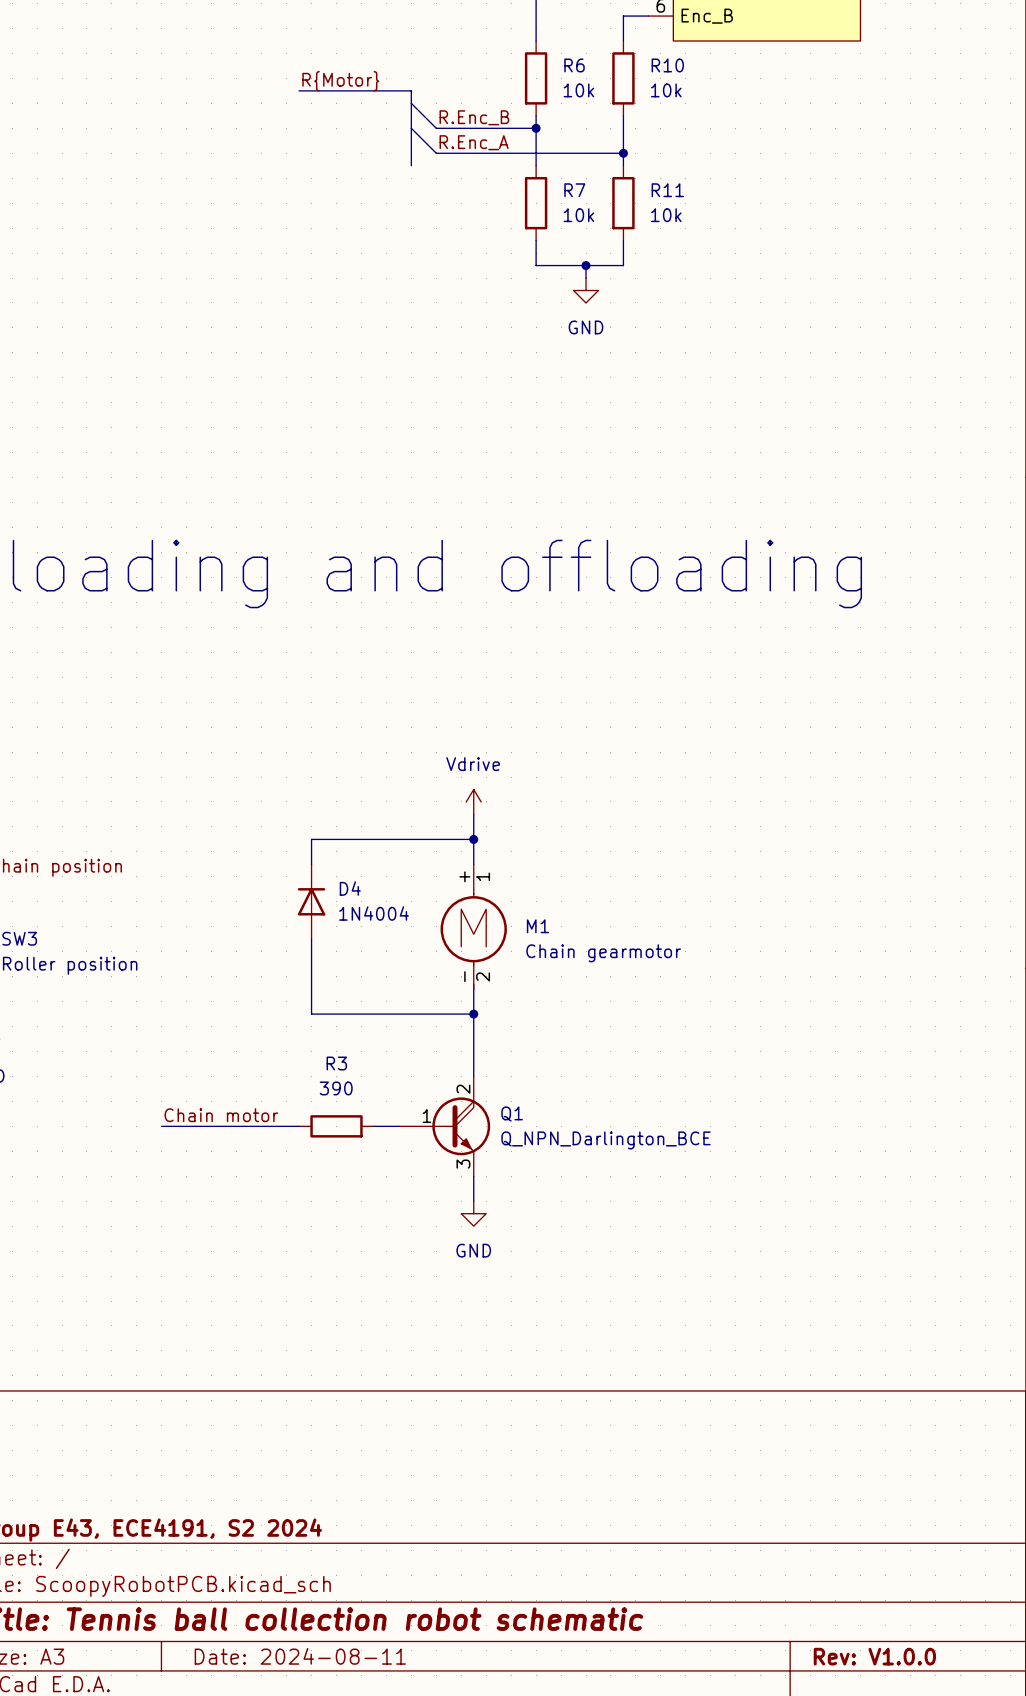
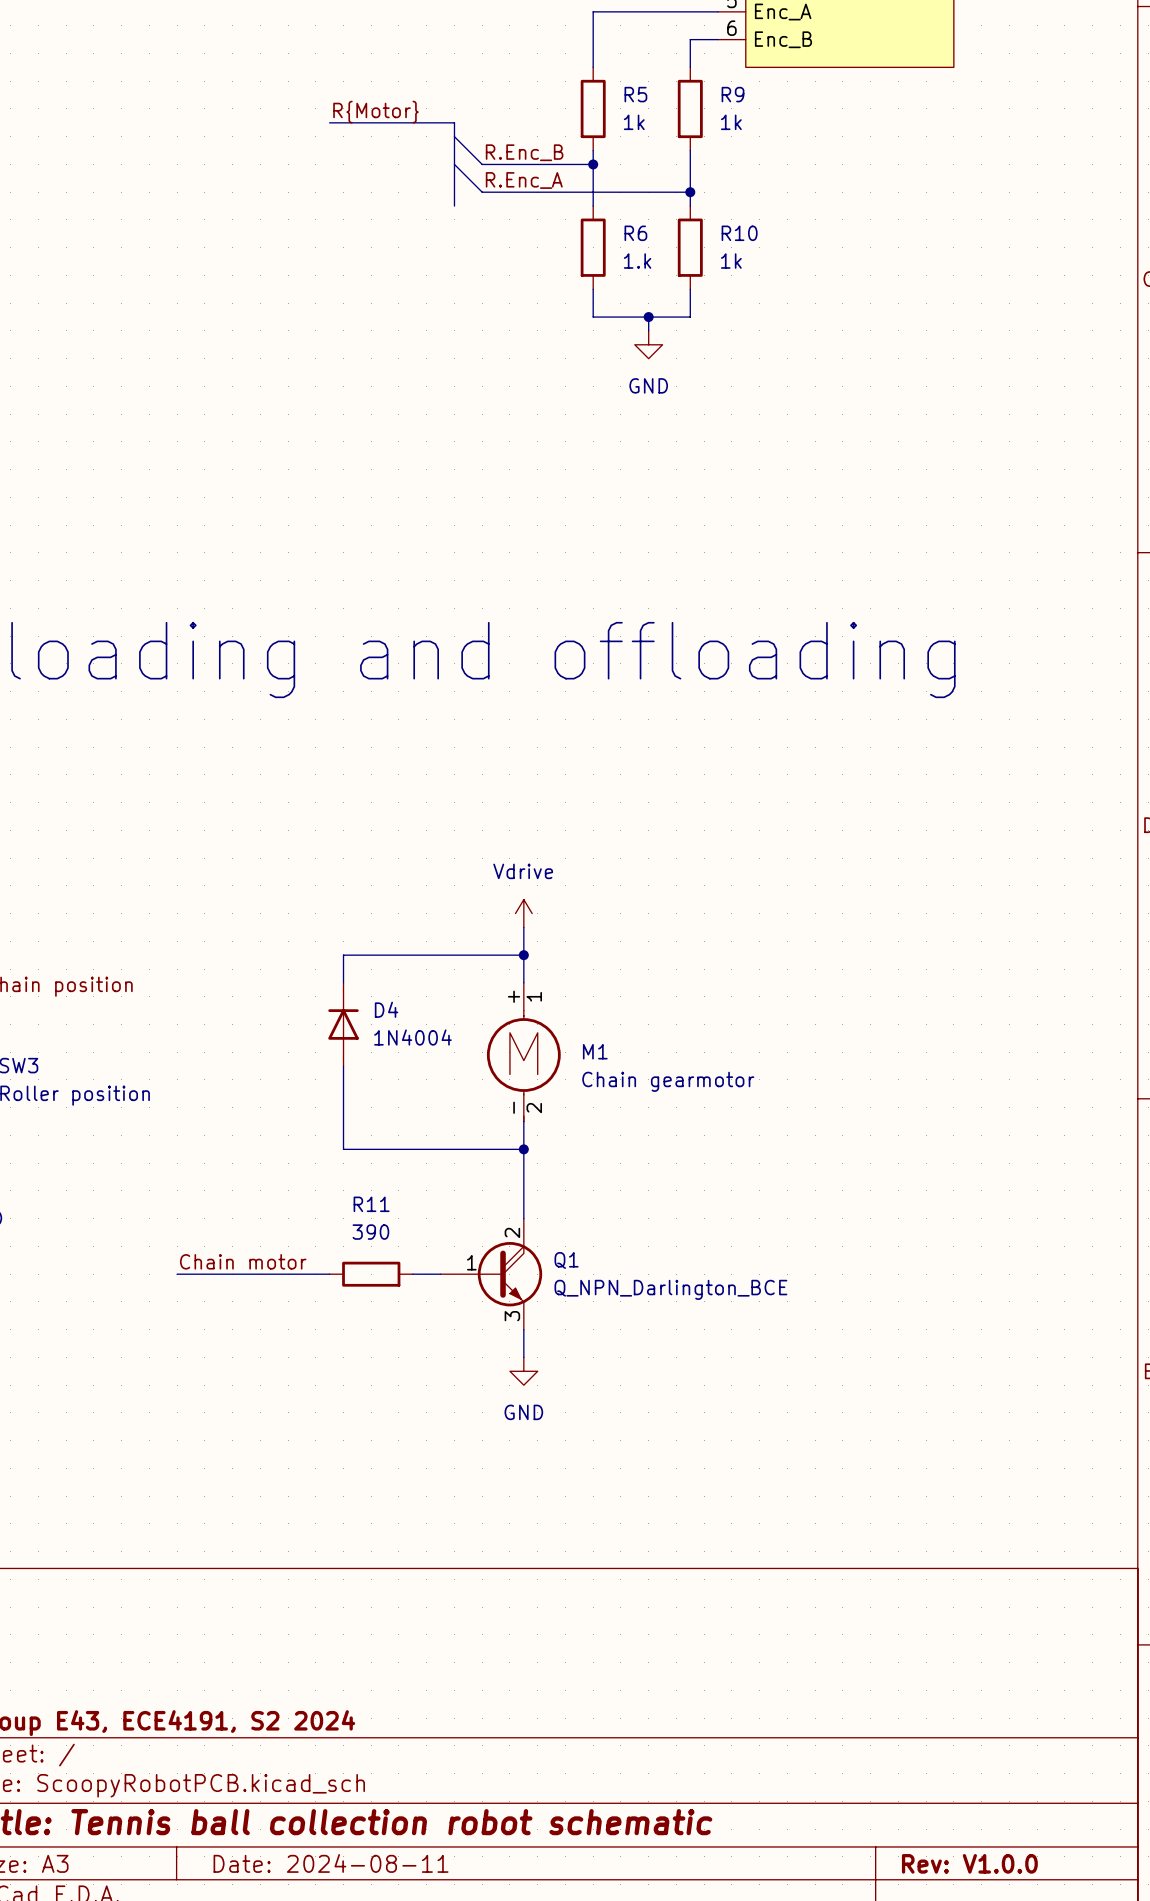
R6 name: R6 (574, 65) -> R5 (635, 94)
R10 name: R10 (667, 65) -> R9 (733, 94)
R6 value: 10k (578, 90) -> 1k (634, 122)
R10 value: 10k (666, 90) -> 1k (731, 122)
R7 name: R7 (574, 190) -> R6 (635, 233)
R11 name: R11 (667, 190) -> R10 (739, 233)
R7 value: 10k (578, 215) -> 1.k (637, 261)
R11 value: 10k (666, 215) -> 1k (731, 261)
R3 name: R3 (336, 1063) -> R11 (371, 1204)

